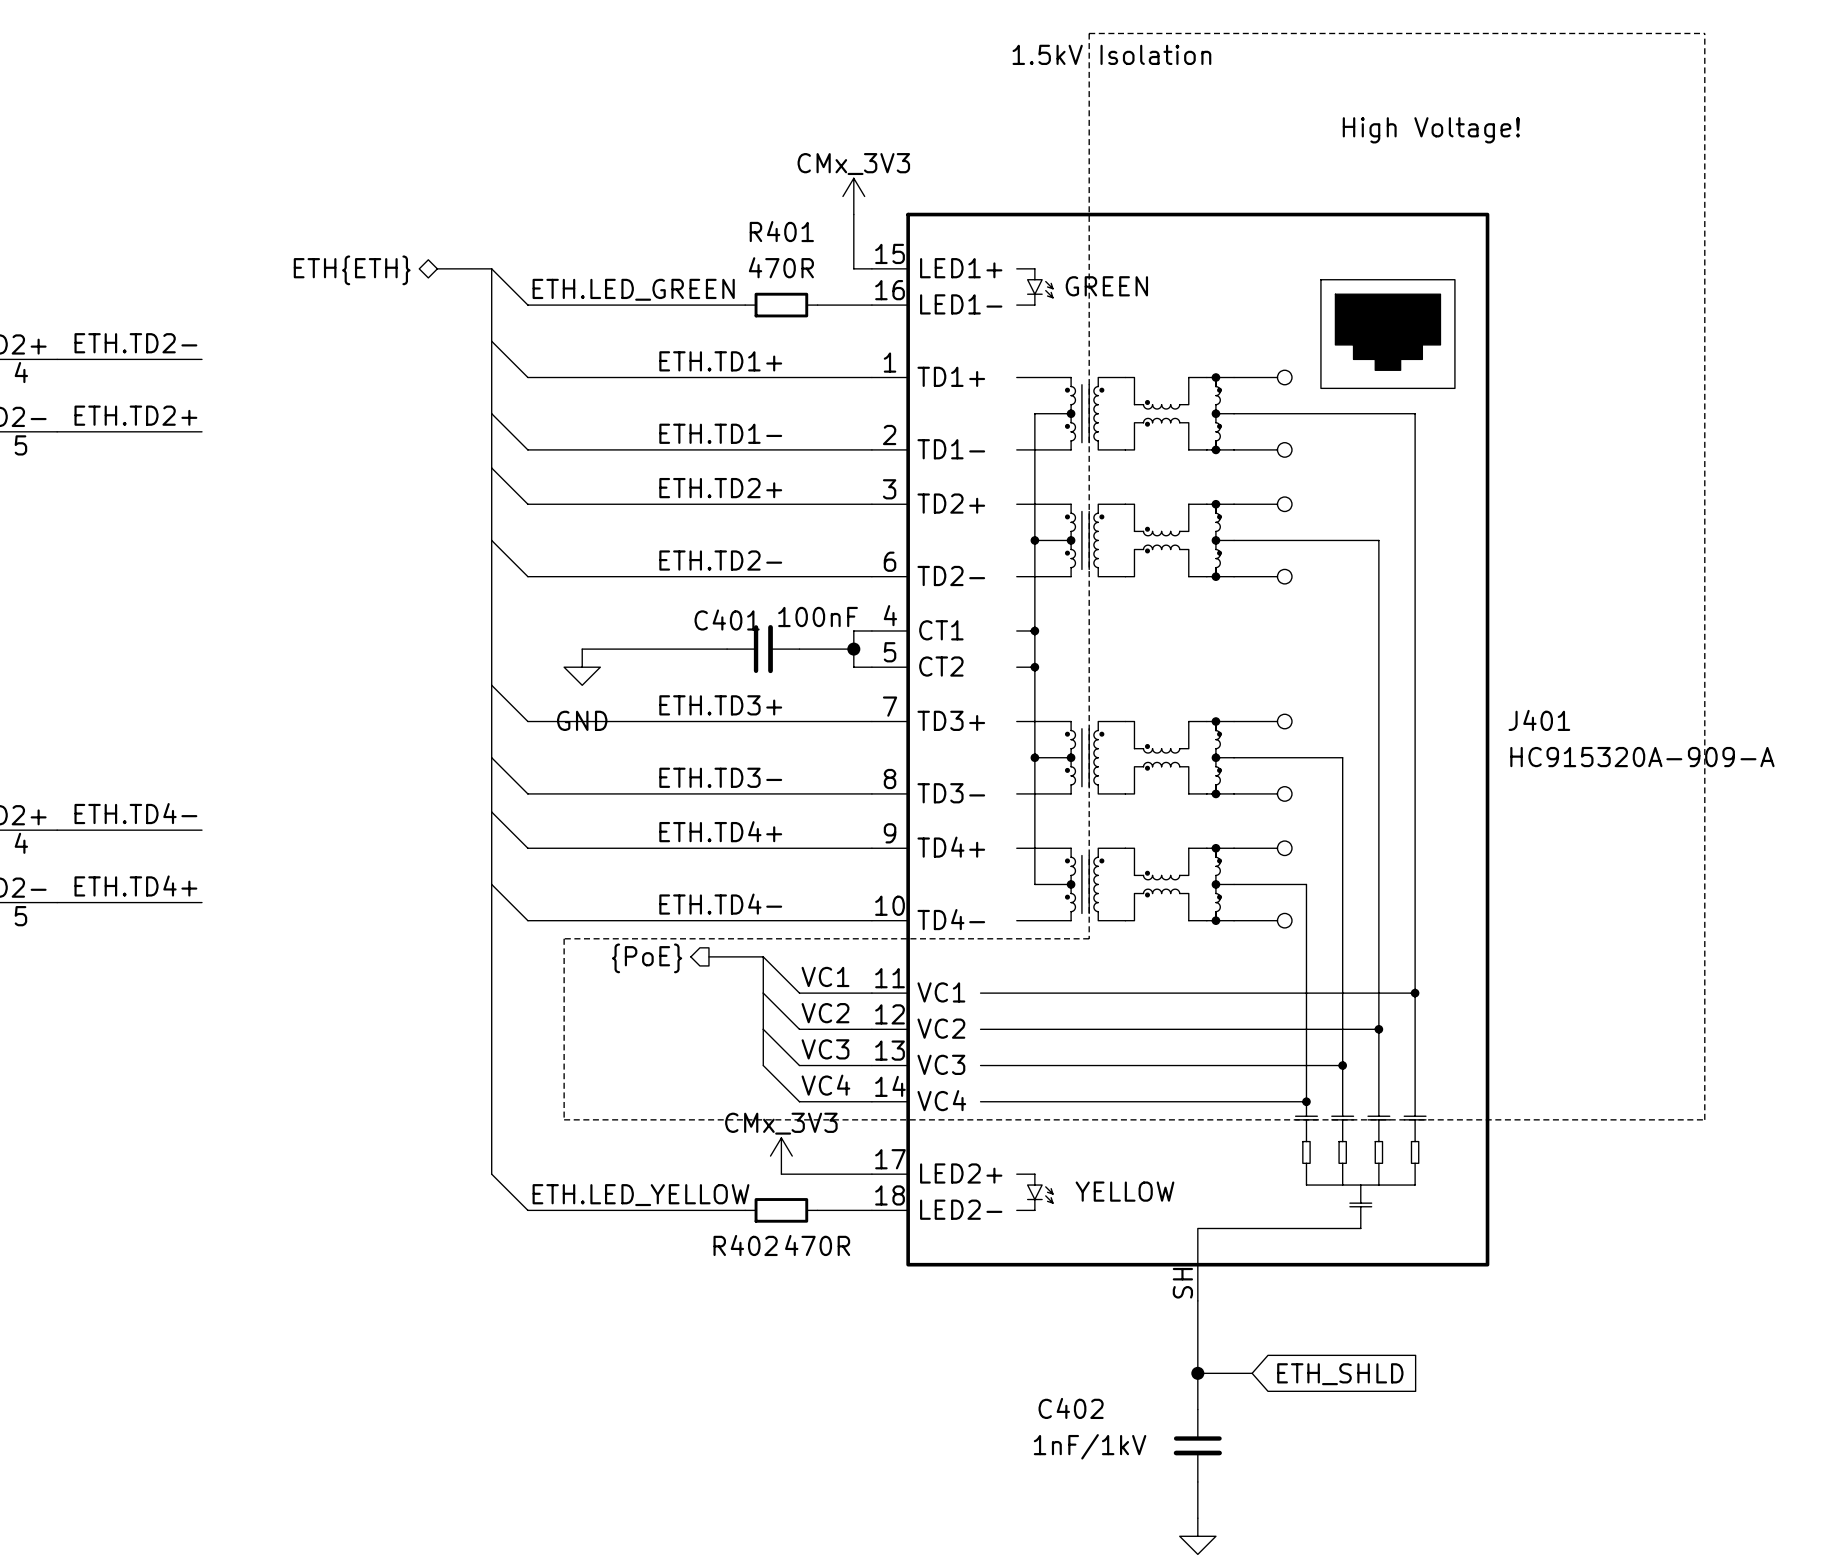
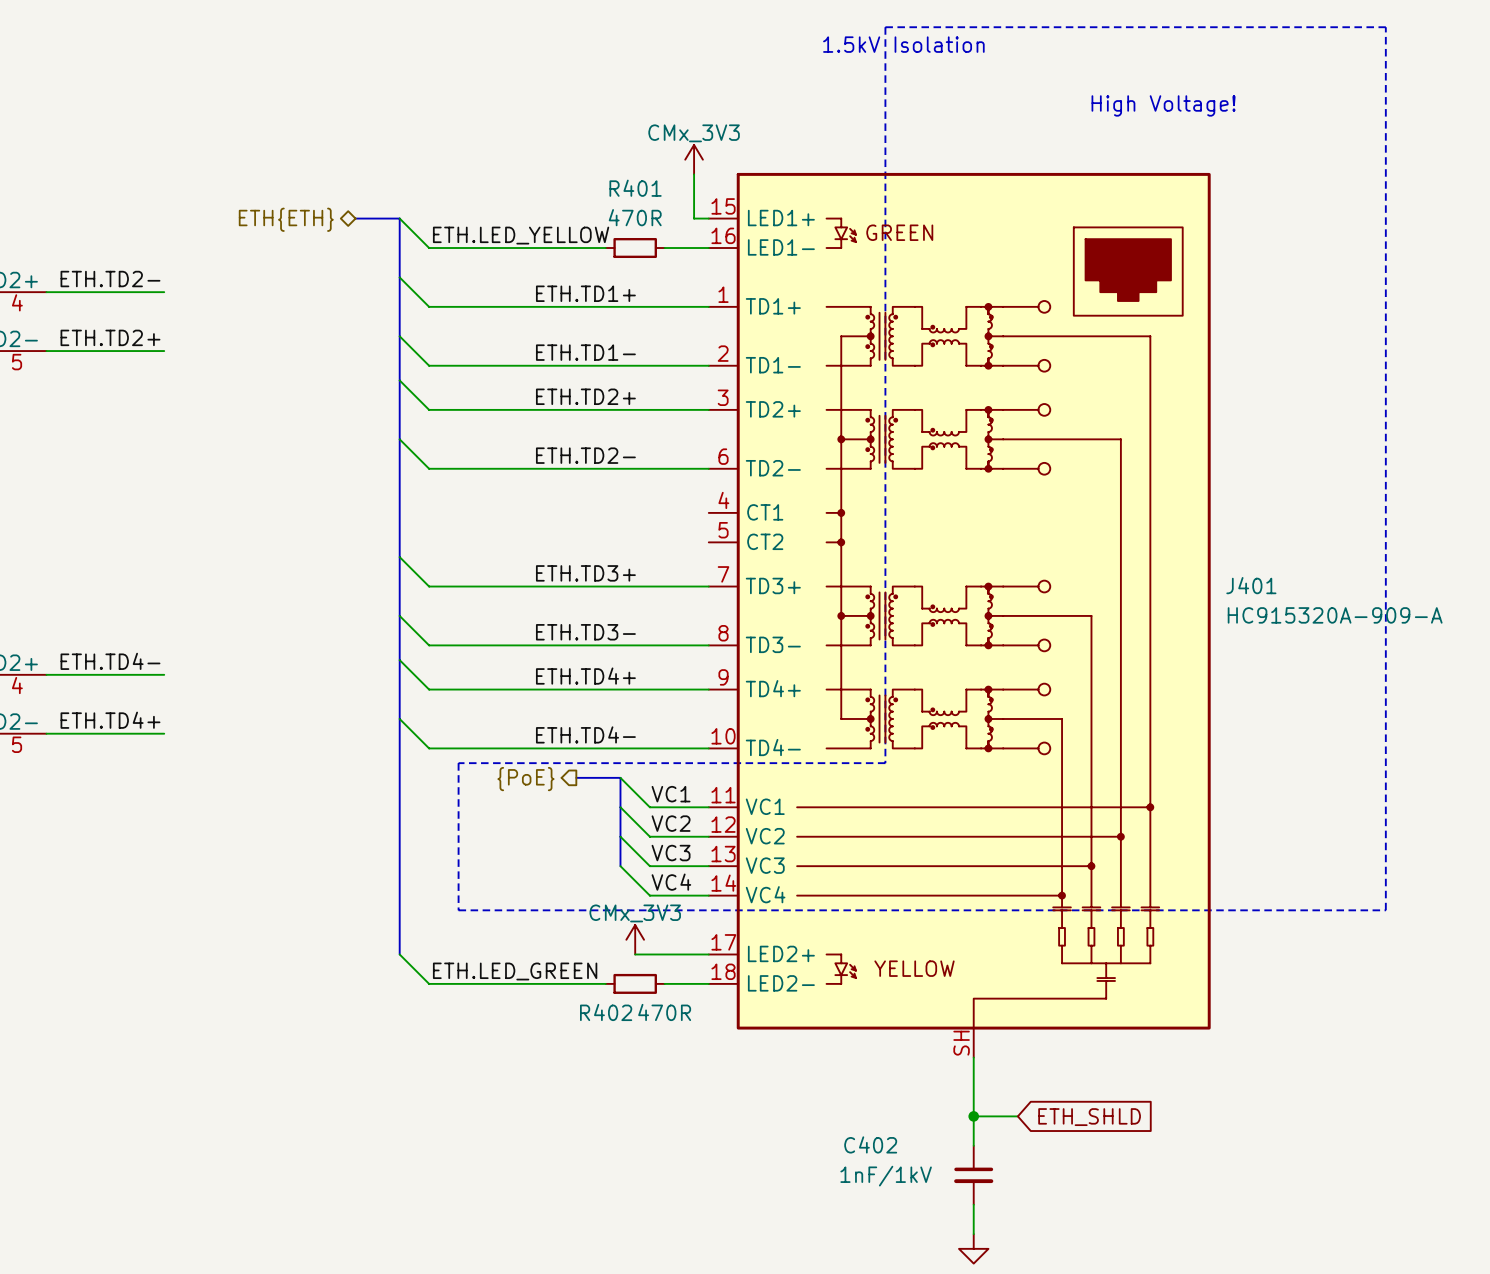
label: ETH.LED_GREEN (633, 289) -> ETH.LED_YELLOW (521, 235)
wire: (871, 630) (853, 630) (853, 667) (871, 667) -> none
wire: (582, 649) (727, 649) -> none
C401: 100nF (763, 649) -> none
wire: (799, 649) (853, 649) -> none
junction: (853, 649) -> none
power symbol: GND (582, 667) -> none
label: ETH.LED_YELLOW (640, 1195) -> ETH.LED_GREEN (515, 971)

